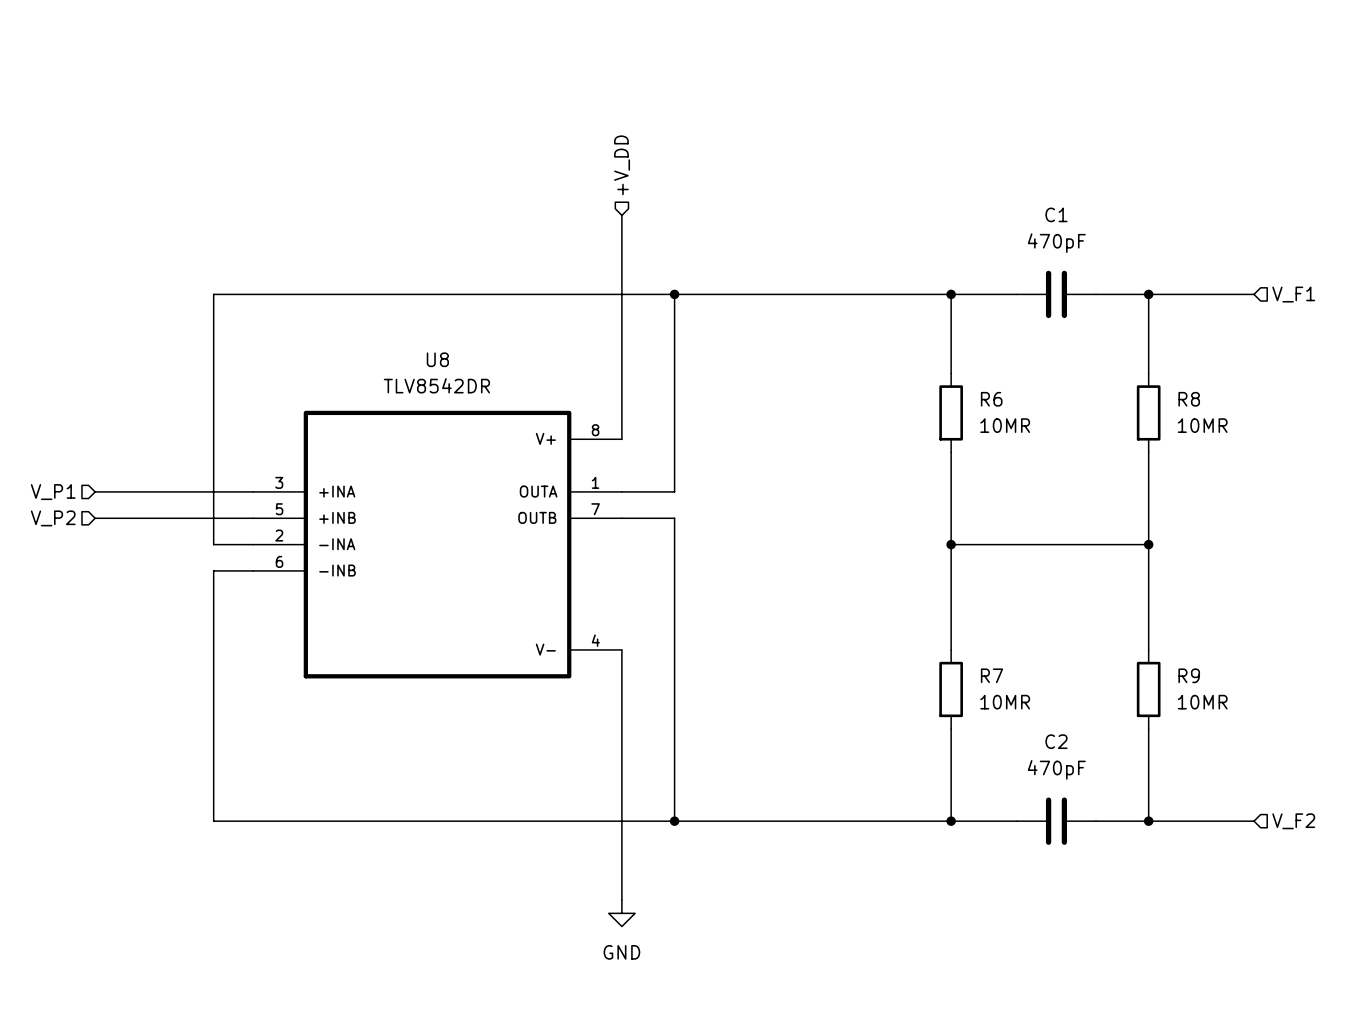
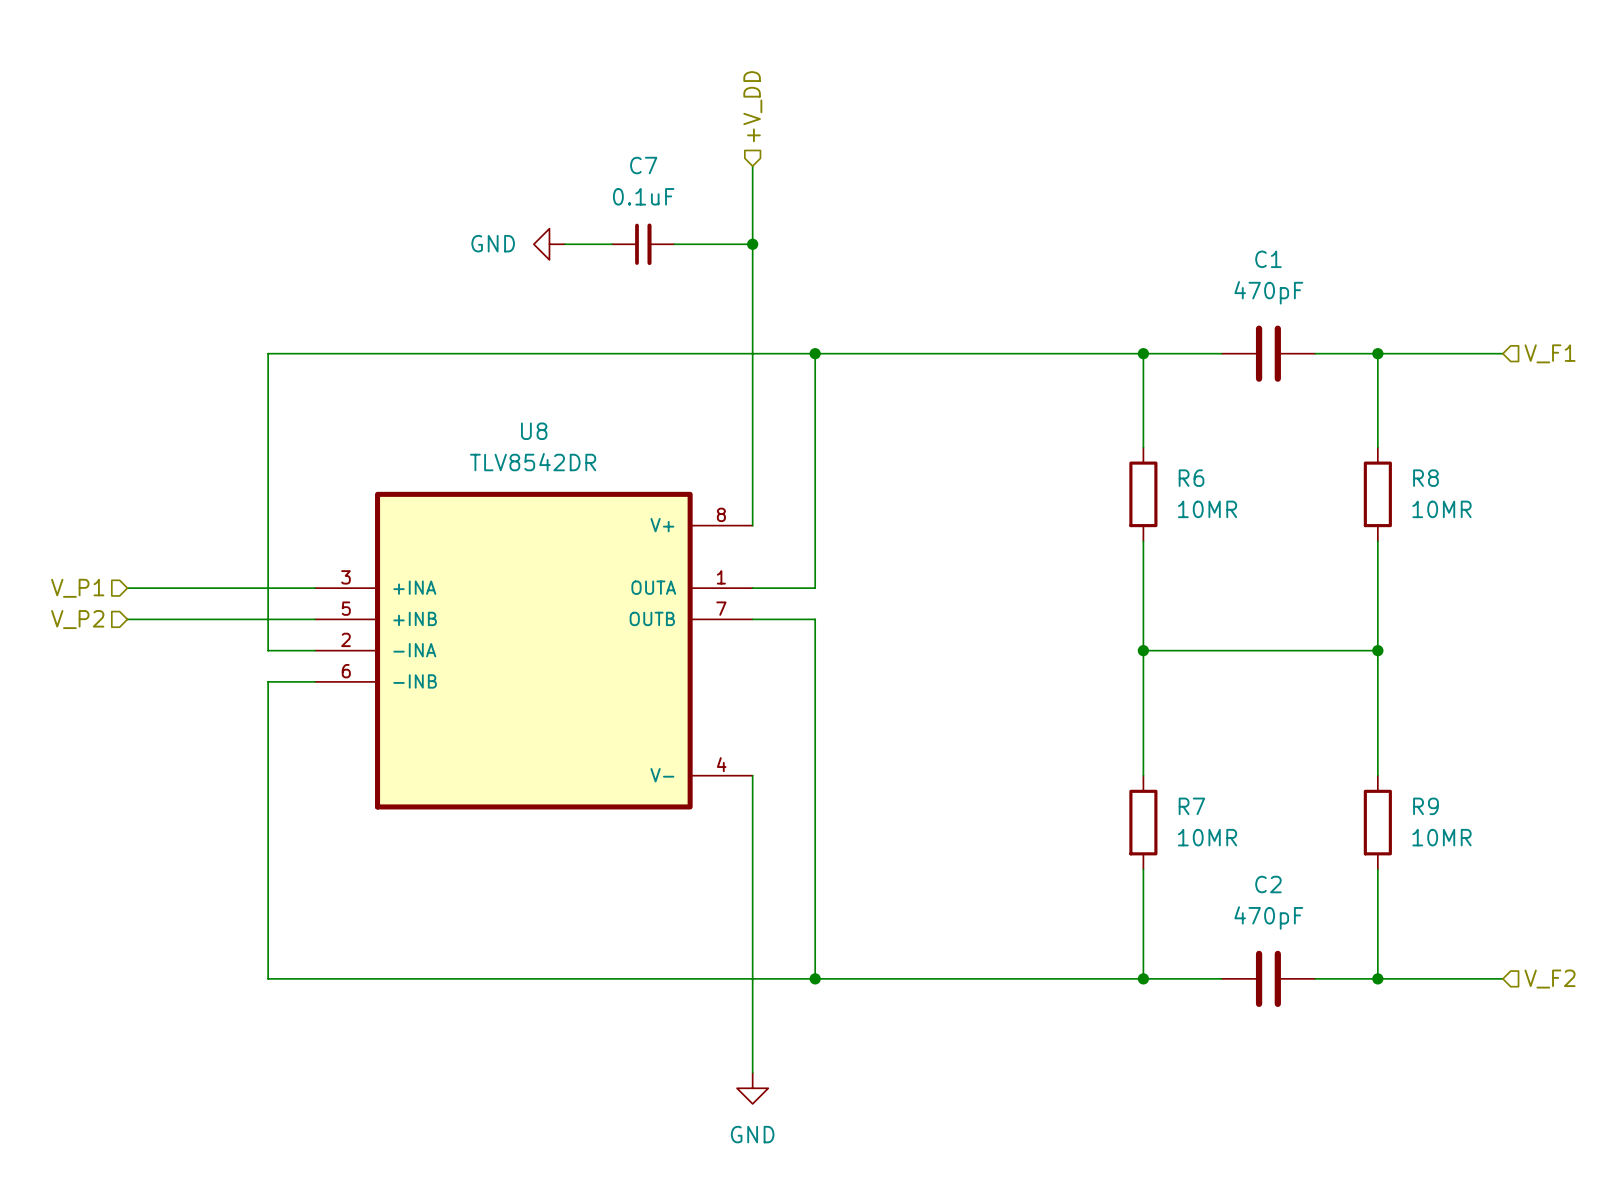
wire: none -> (752, 166) (752, 259)
hierarchical label position: +V_DD (622, 165) -> +V_DD (752, 106)
power symbol: none -> GND (549, 244)
wire: none -> (565, 244) (611, 244)
C7: none -> 0.1uF (643, 244)
wire: none -> (674, 244) (752, 244)
junction: none -> (752, 244)

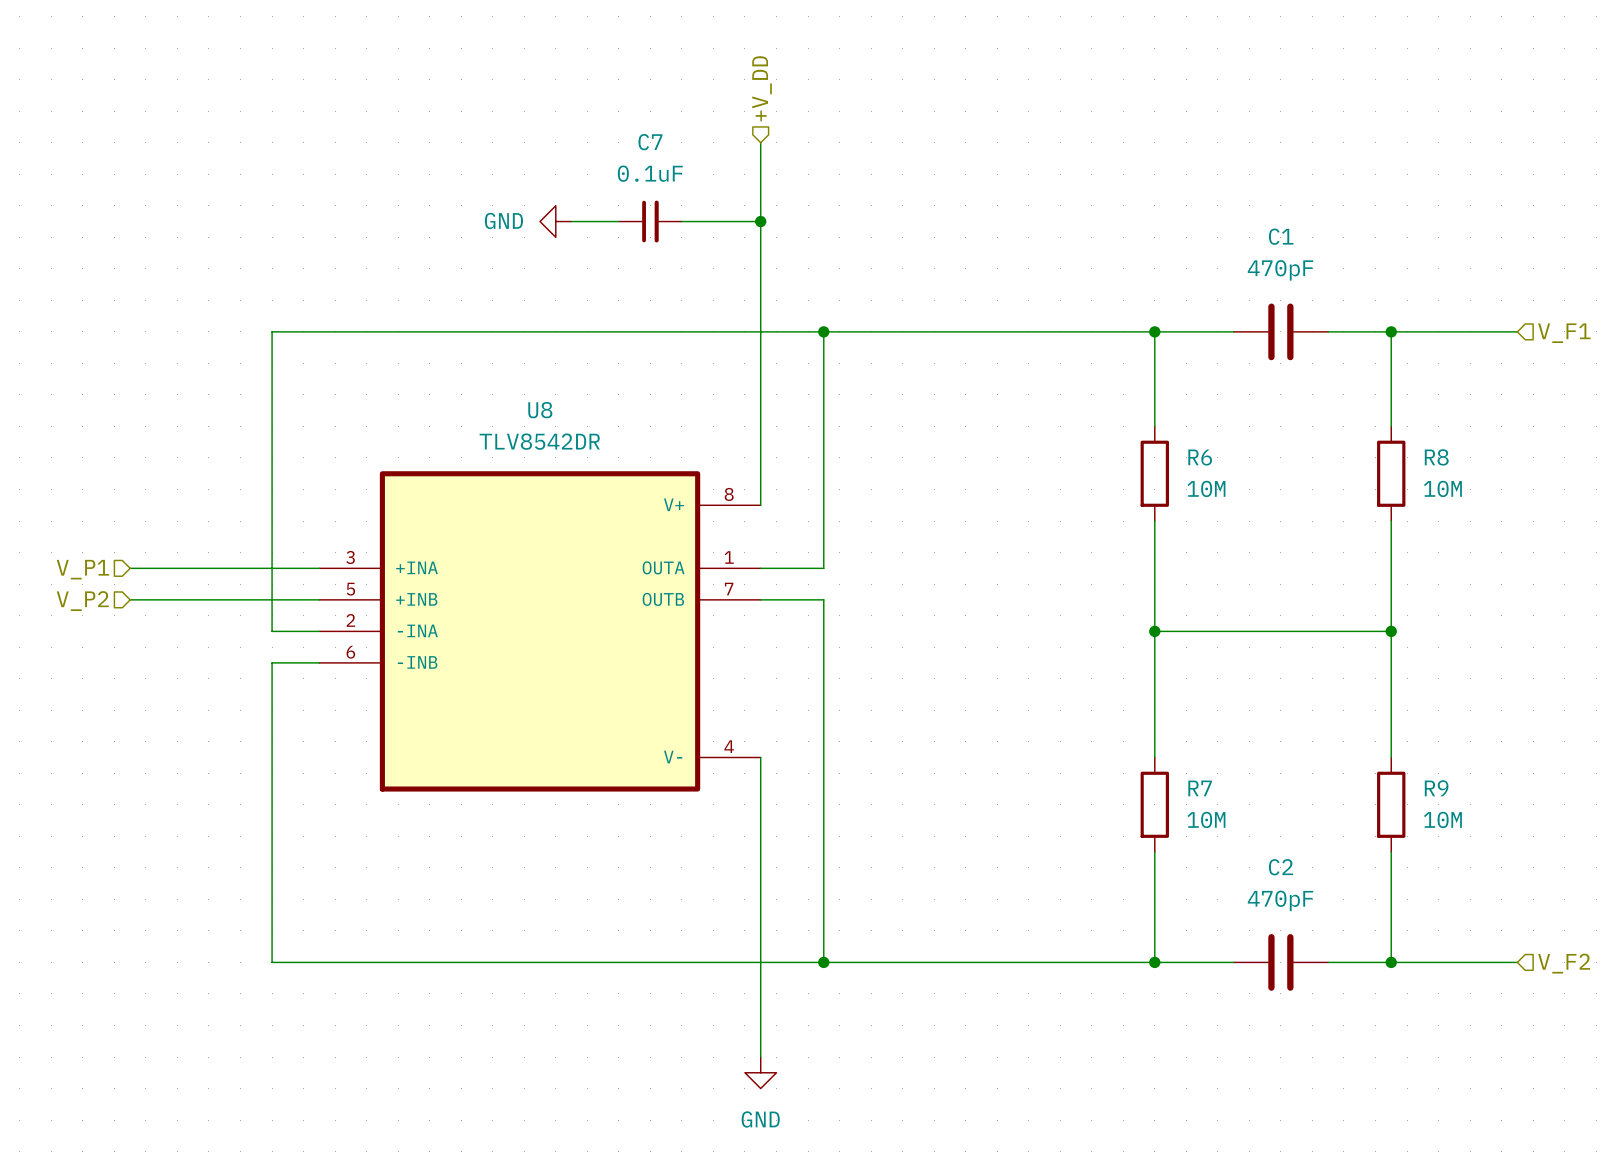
R6 value: 10MR (1207, 509) -> 10M (1206, 488)
R8 value: 10MR (1441, 509) -> 10M (1442, 488)
R7 value: 10MR (1207, 837) -> 10M (1206, 819)
R9 value: 10MR (1441, 837) -> 10M (1442, 819)

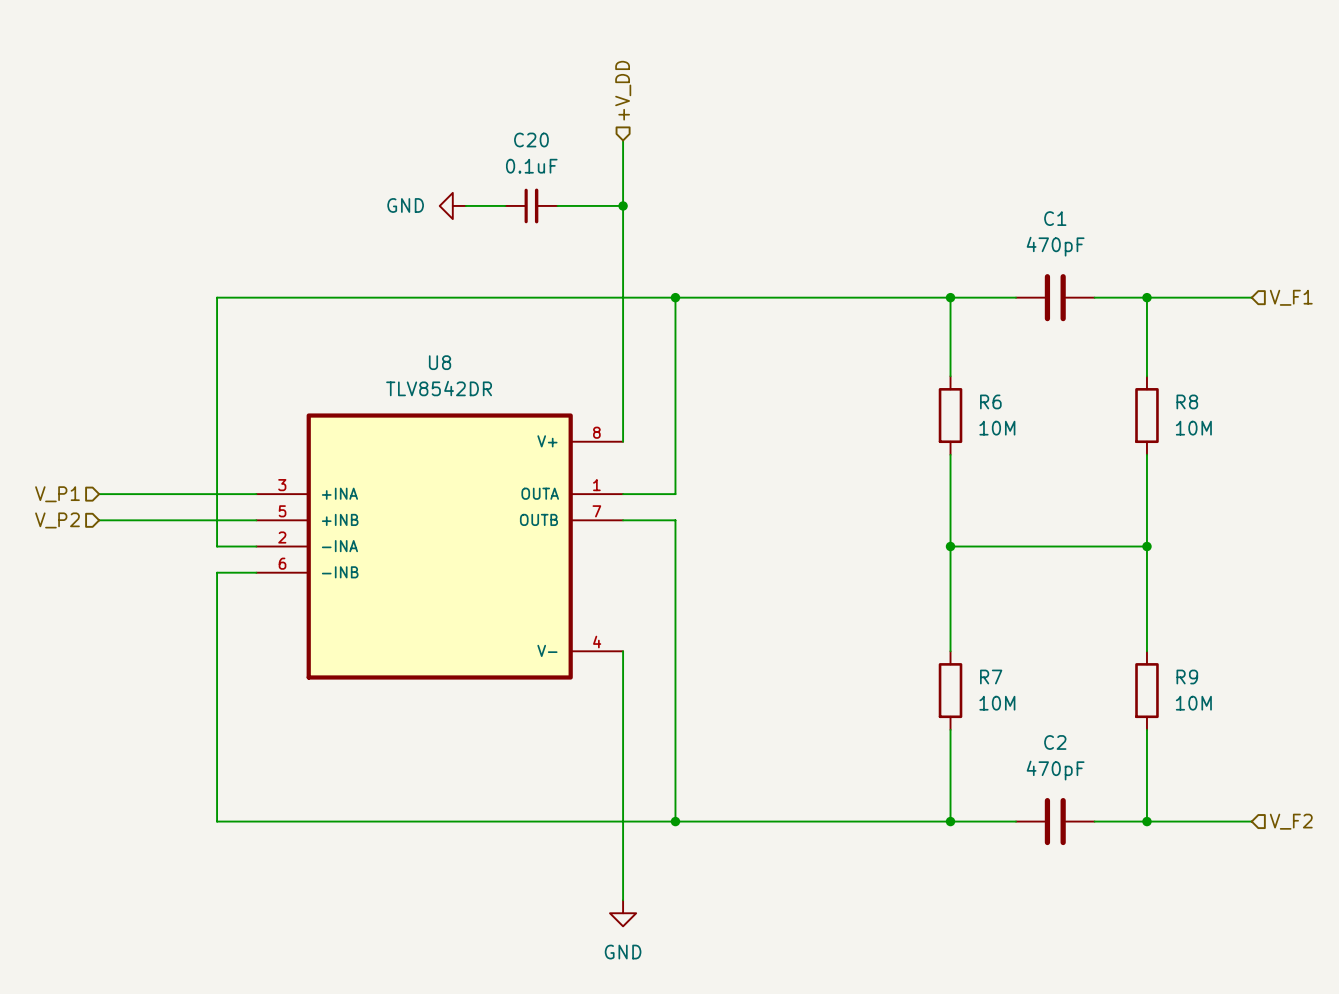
C7 name: C7 (650, 142) -> C20 (531, 140)

